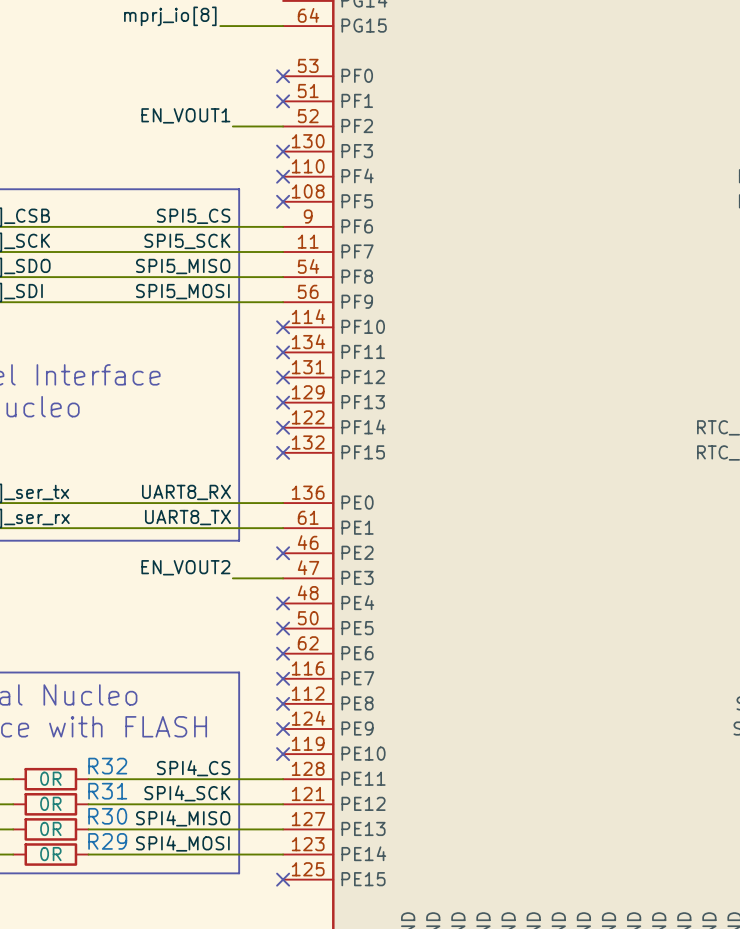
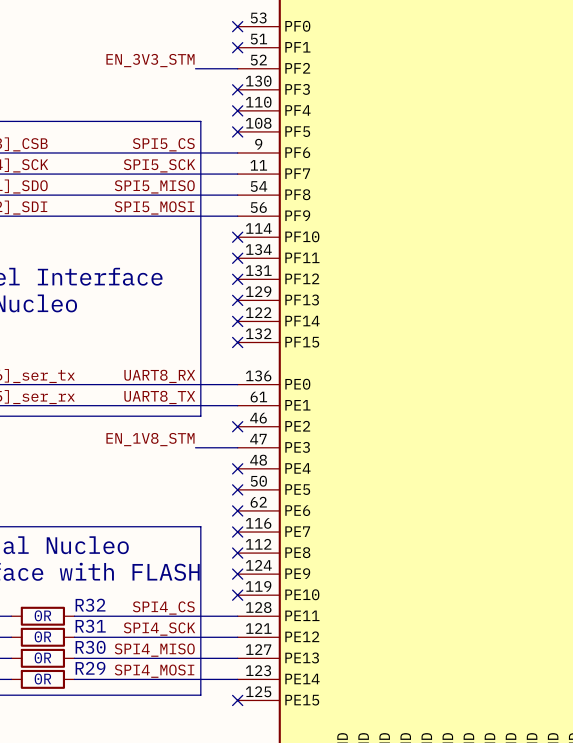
label: EN_VOUT1 (185, 115) -> EN_3V3_STM (150, 60)
label: EN_VOUT2 (185, 567) -> EN_1V8_STM (150, 439)

